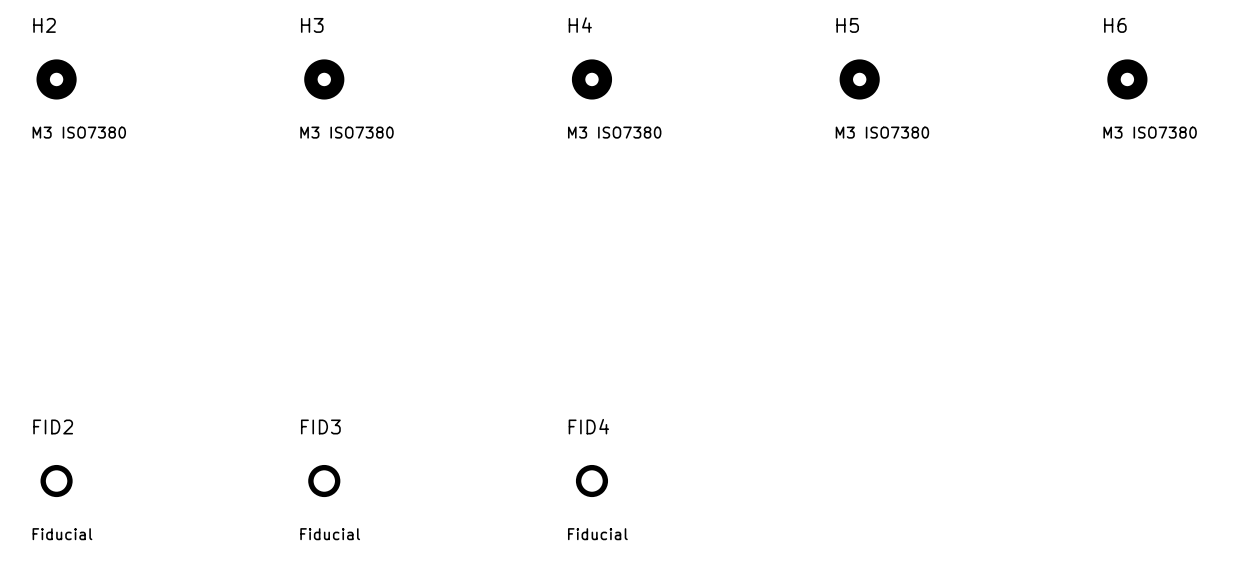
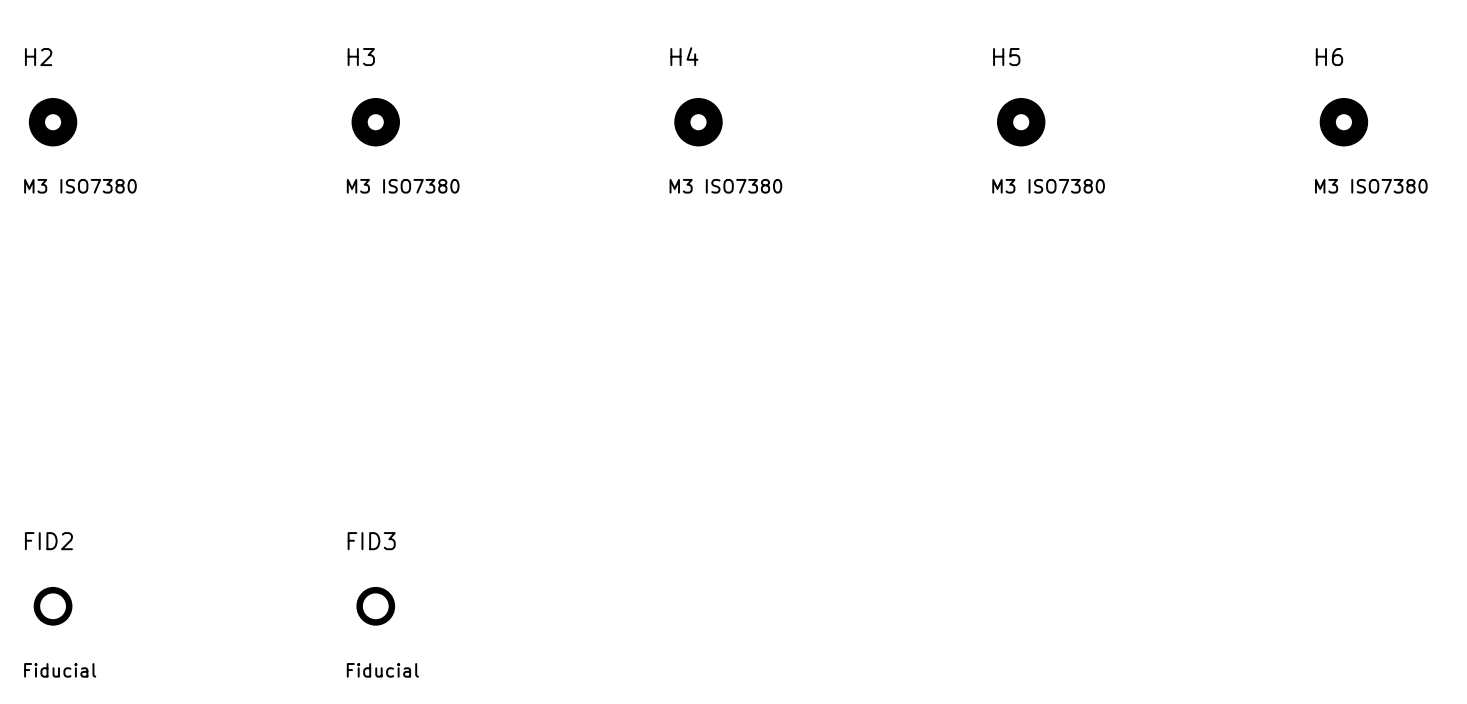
FID4: Fiducial (591, 481) -> none

